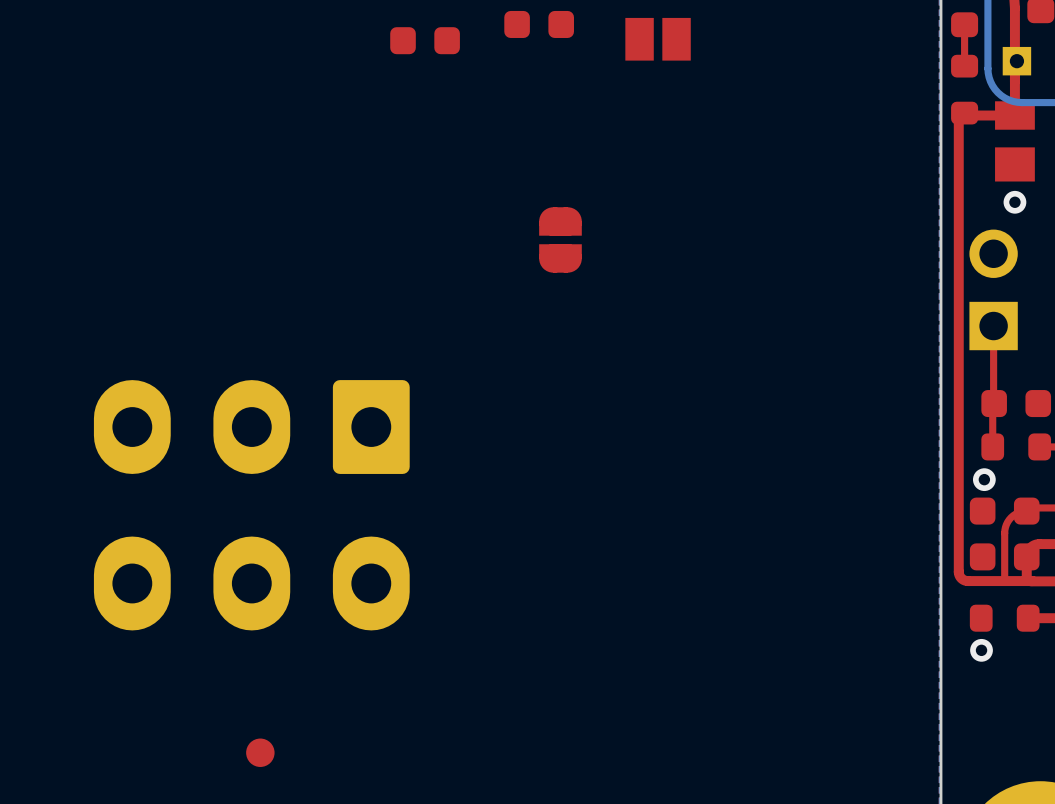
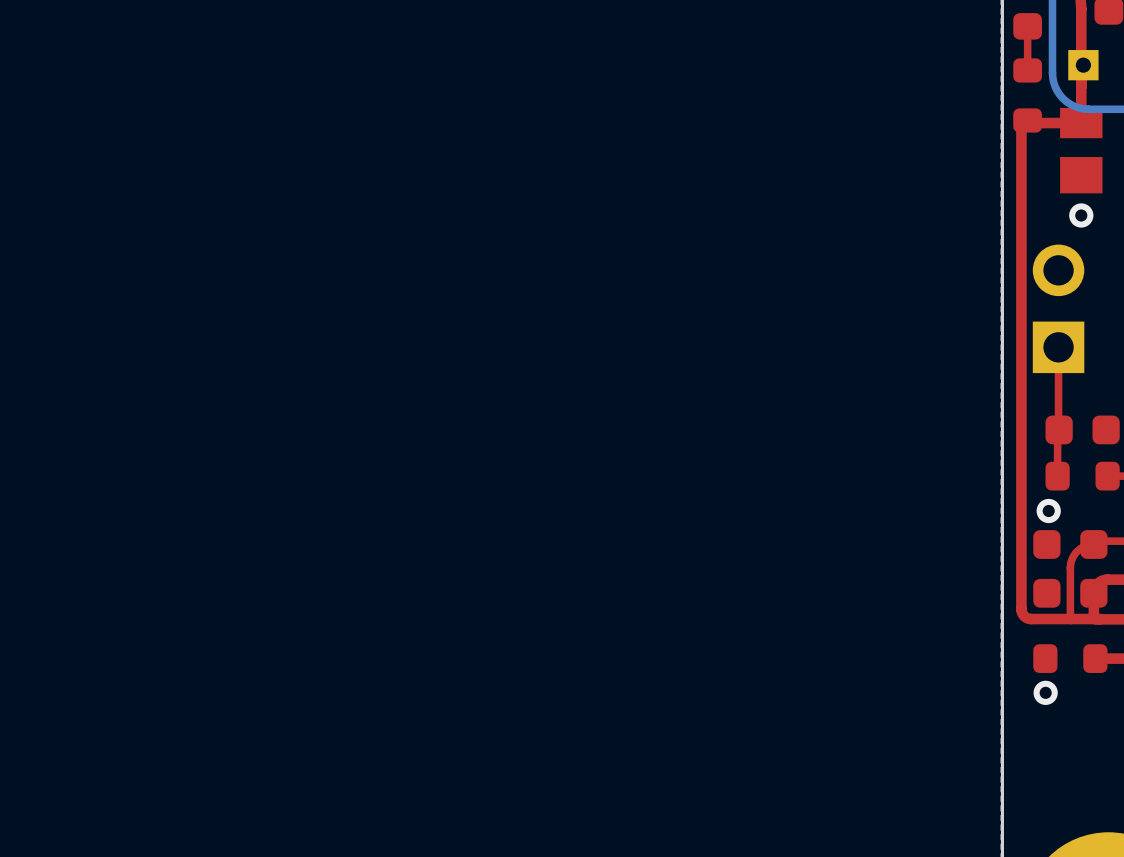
part: (539, 24) -> none
part: (658, 39) -> none
part: (425, 40) -> none
part: (560, 239) -> none
part: (251, 505) -> none
part: (260, 752) -> none

